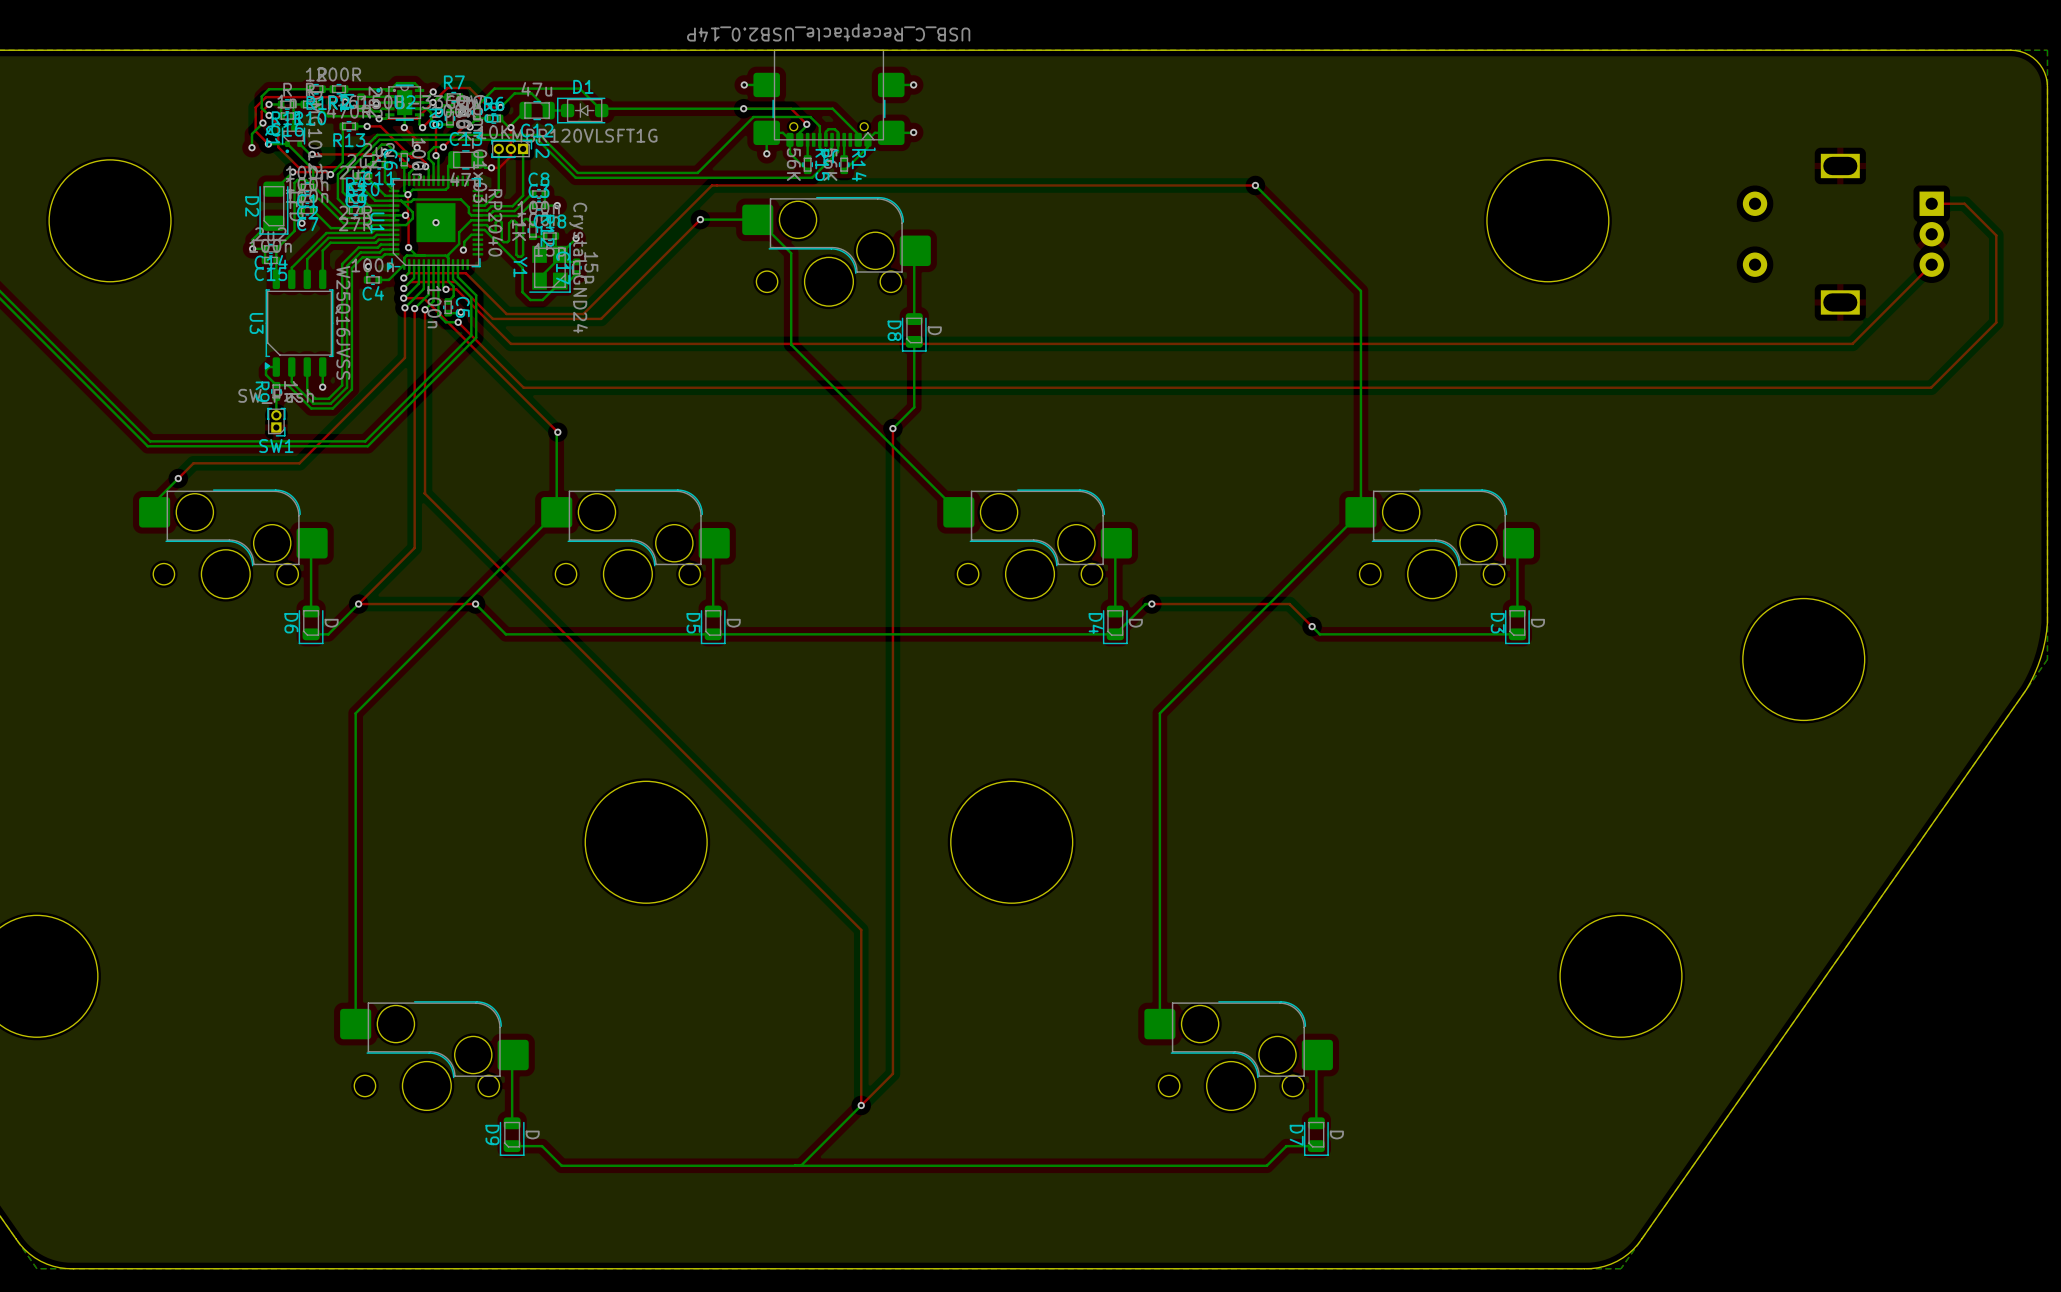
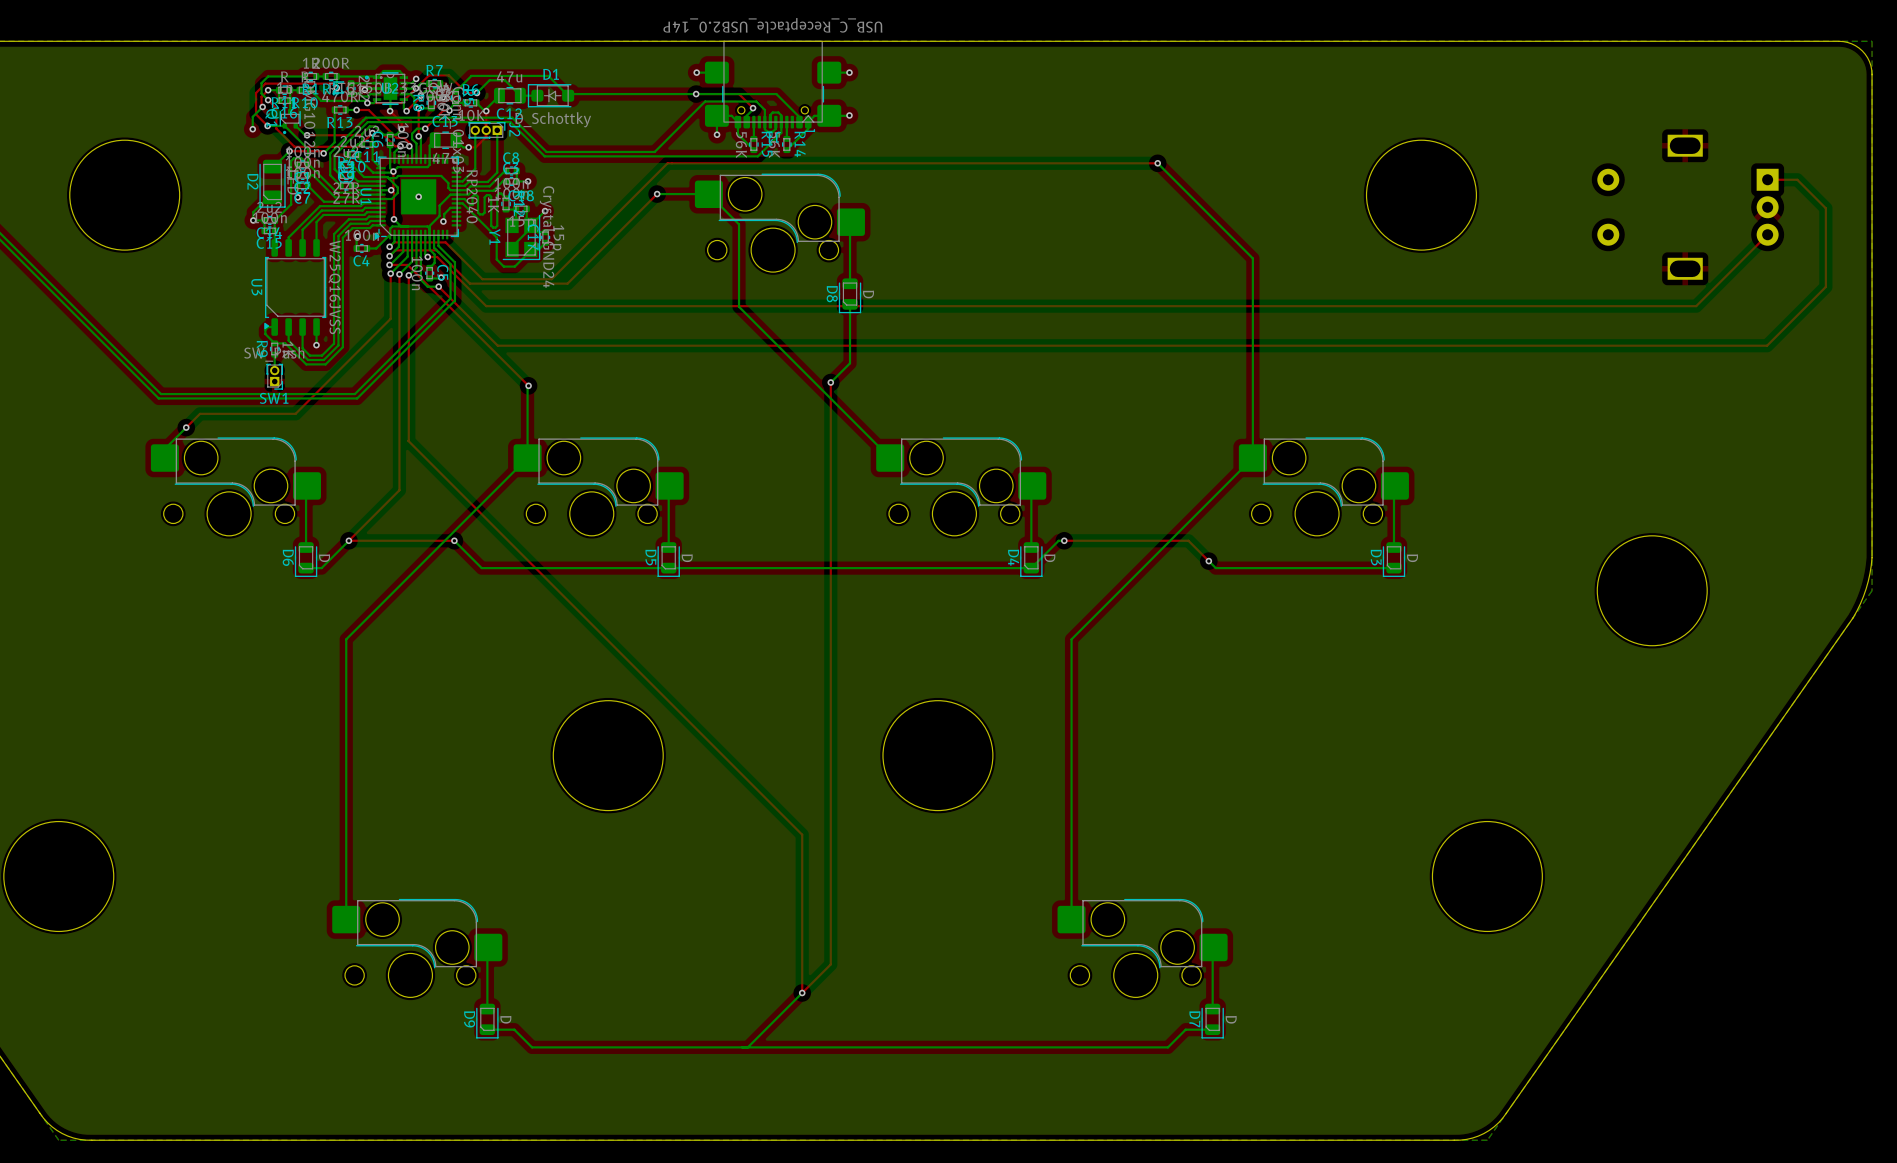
D1 value: MBR120VLSFT1G (584, 135) -> D_Schottky (553, 119)

